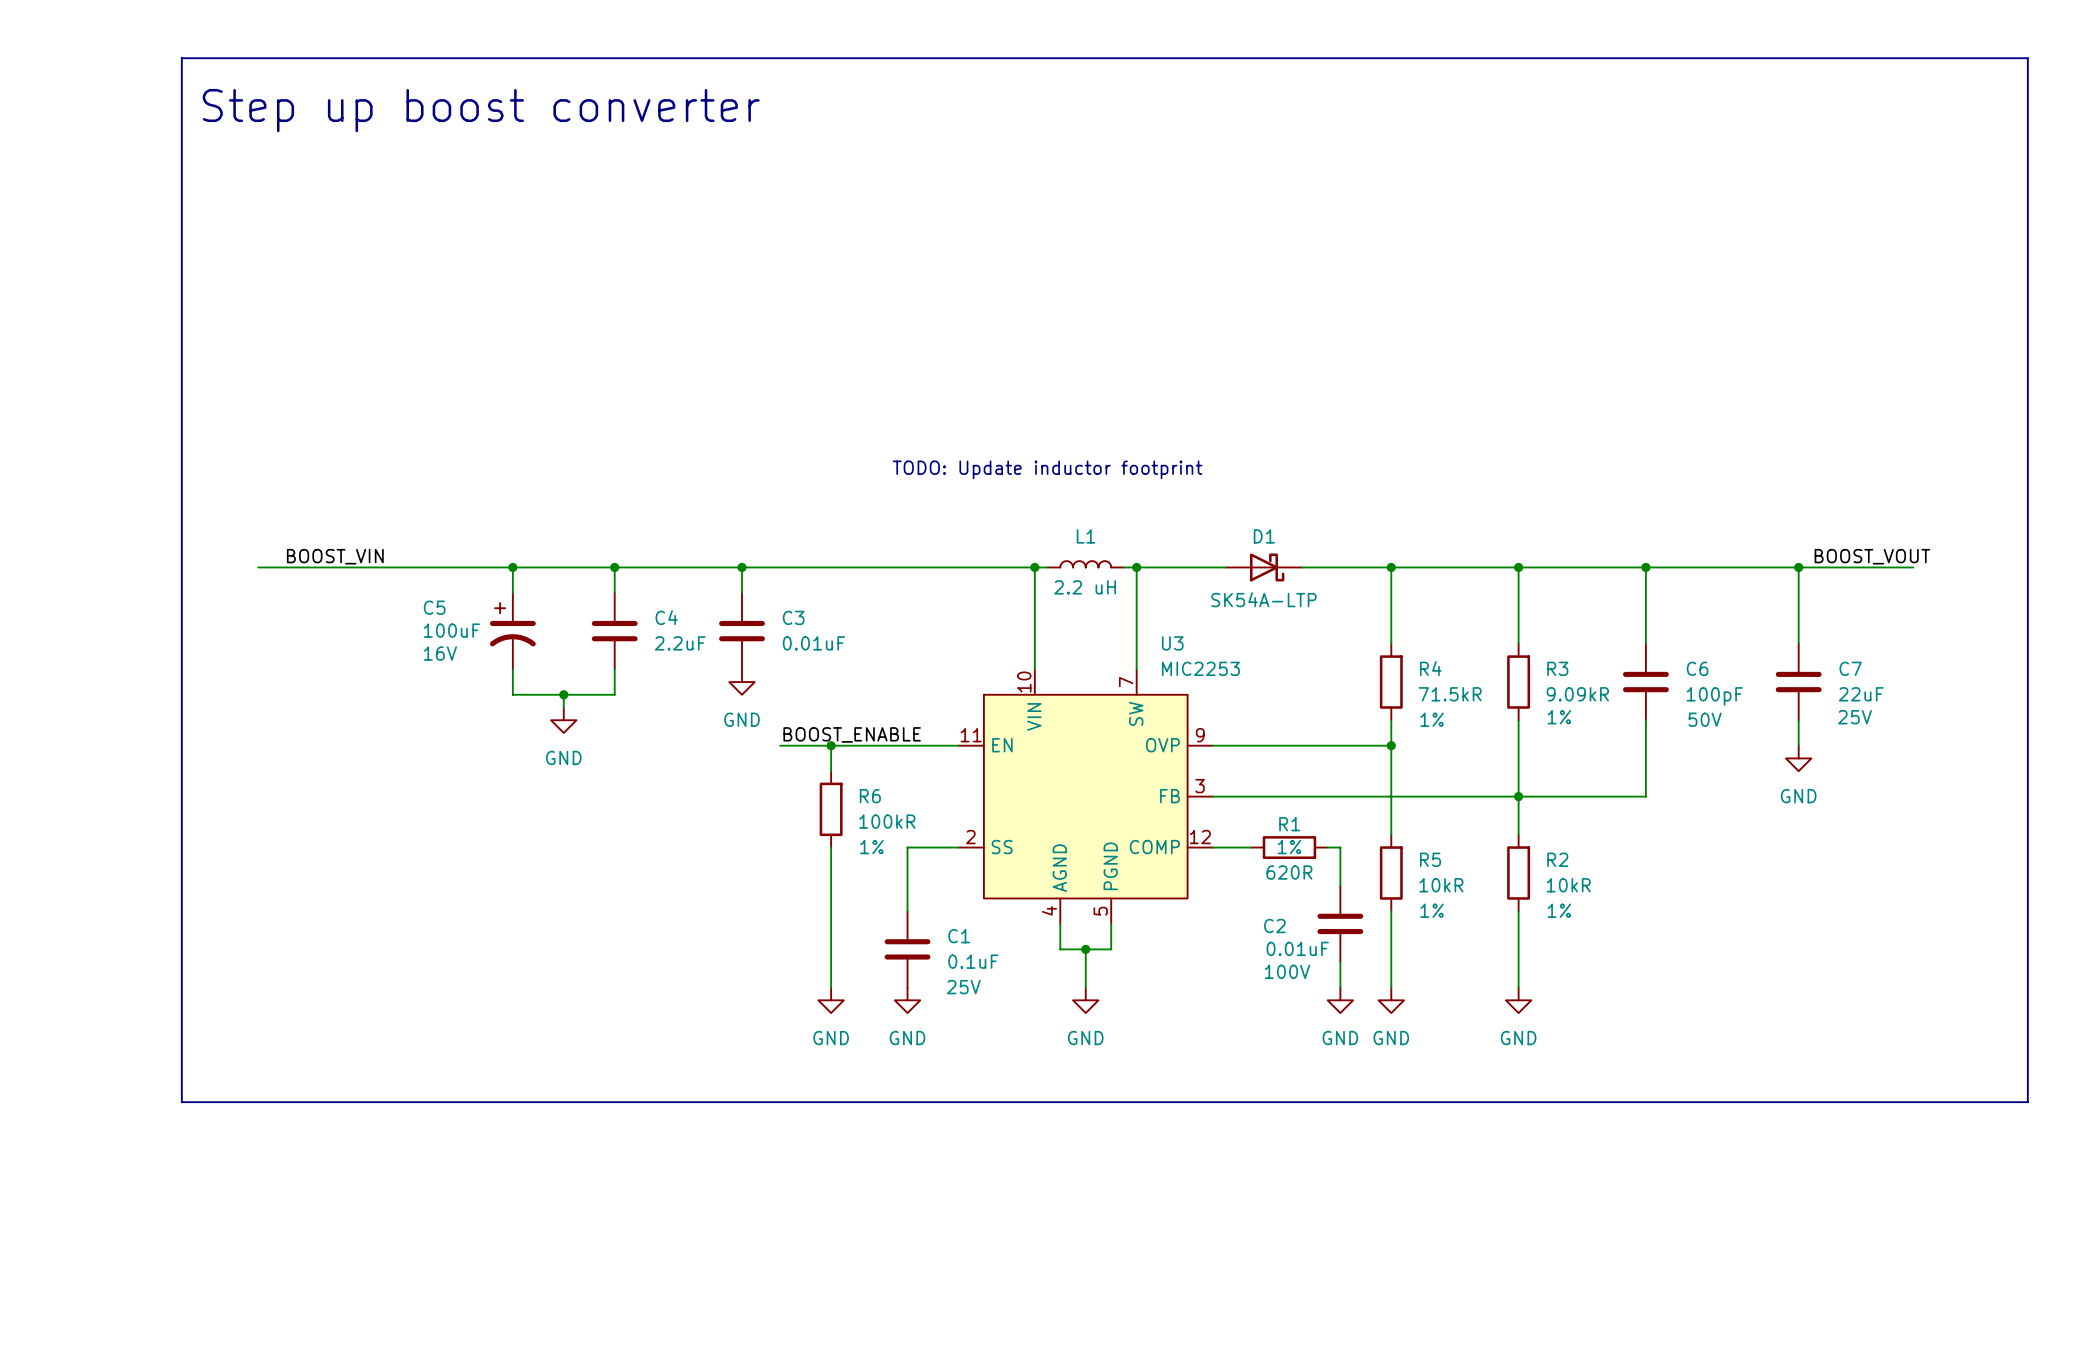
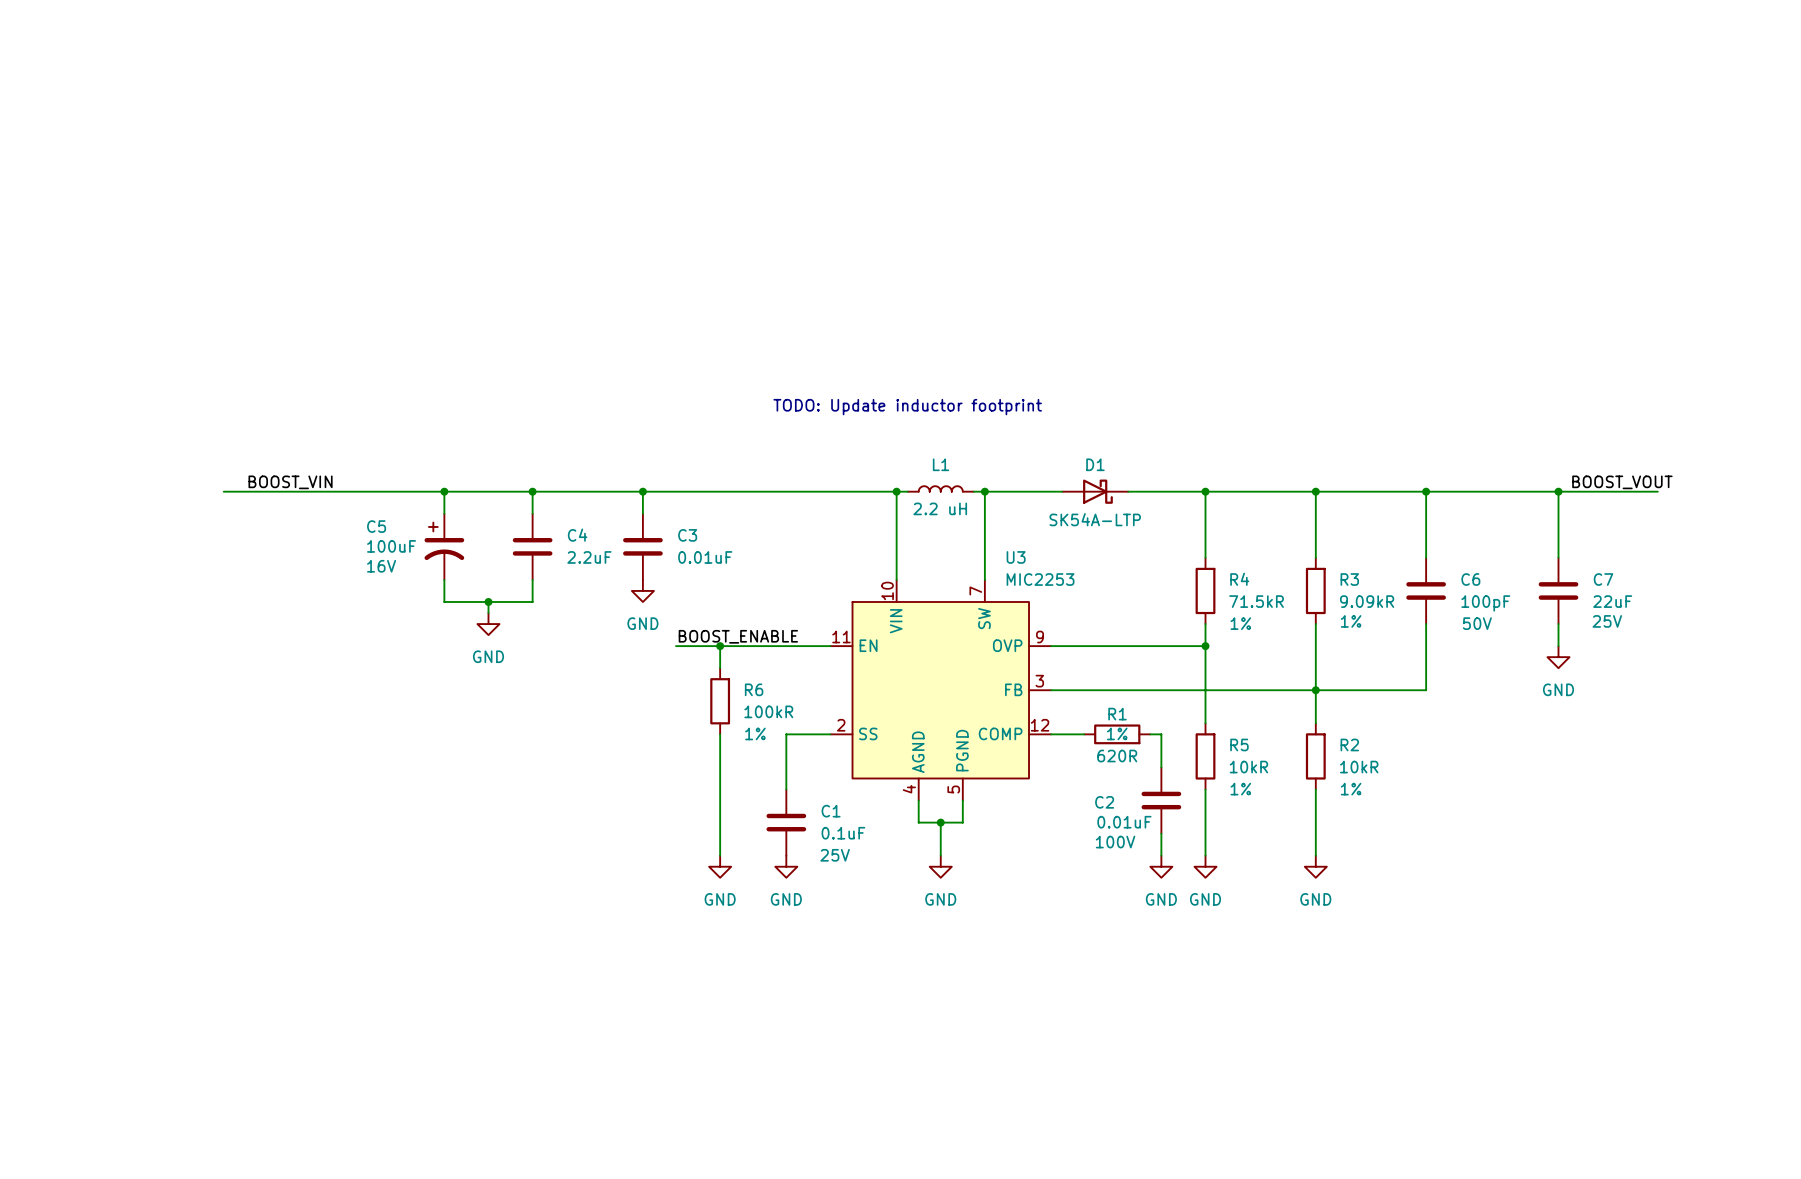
line: (181, 58) (2027, 58) (2027, 1102) (181, 1102) (181, 58) -> none
text: Step up boost converter (481, 110) -> none

